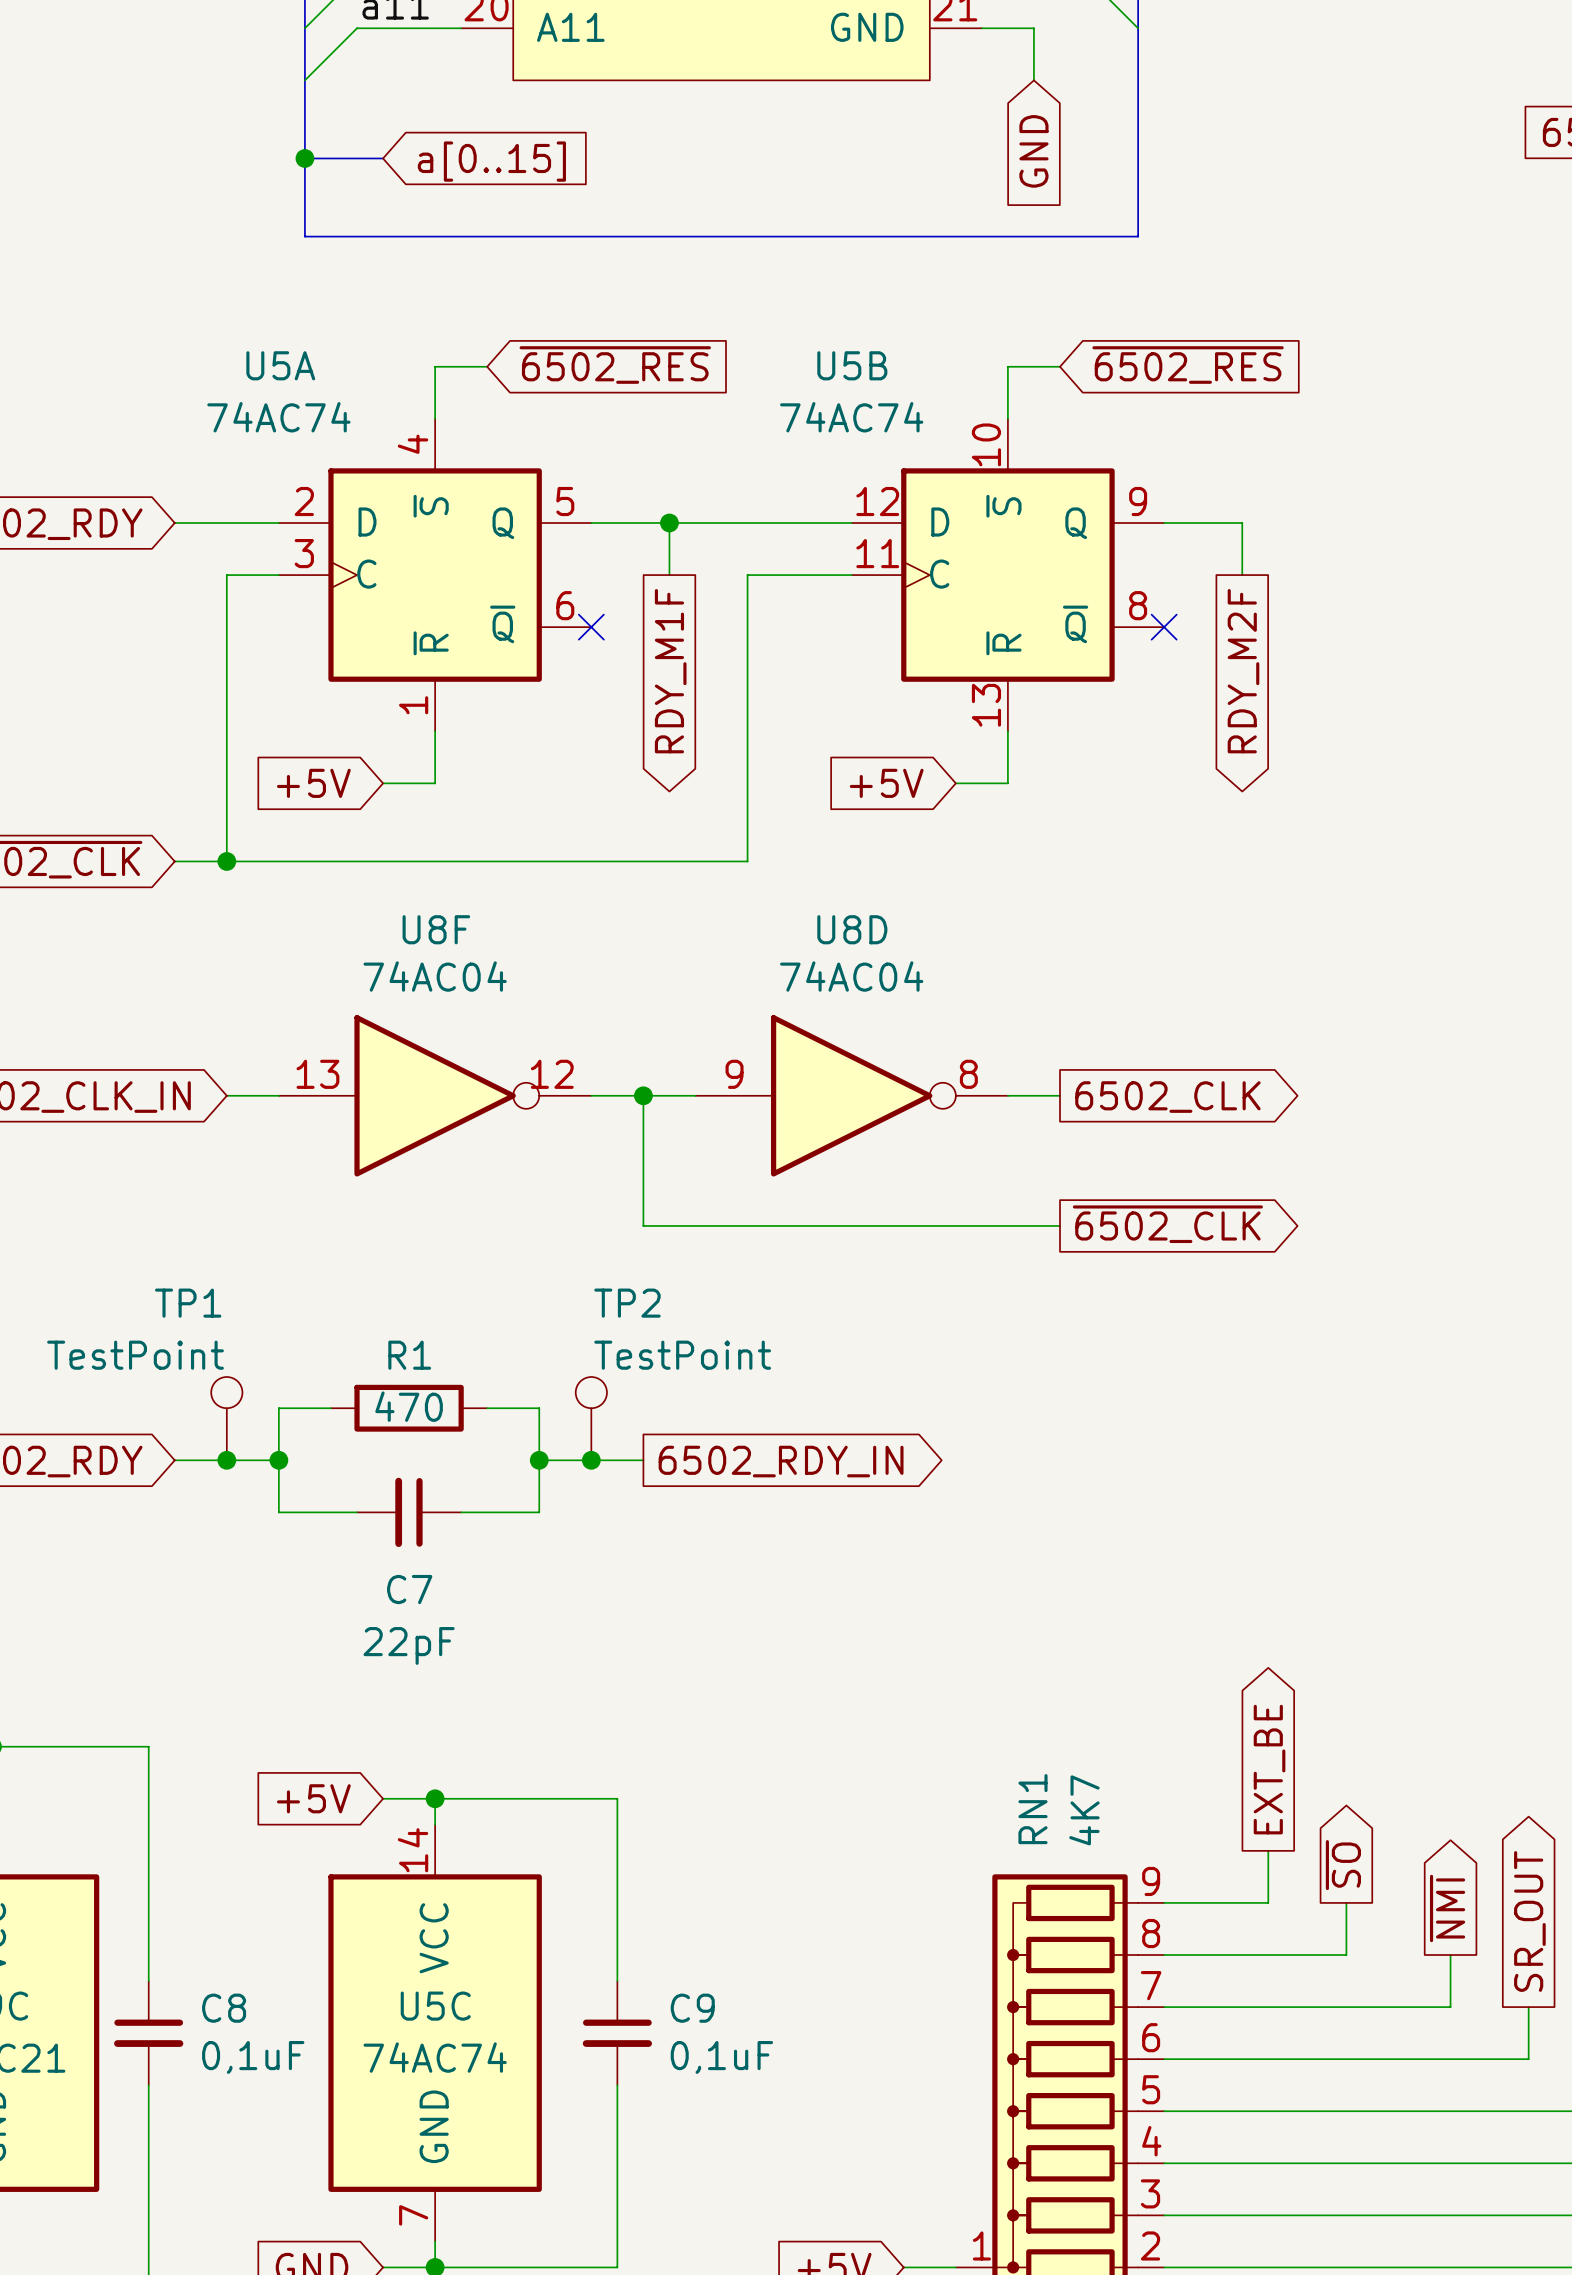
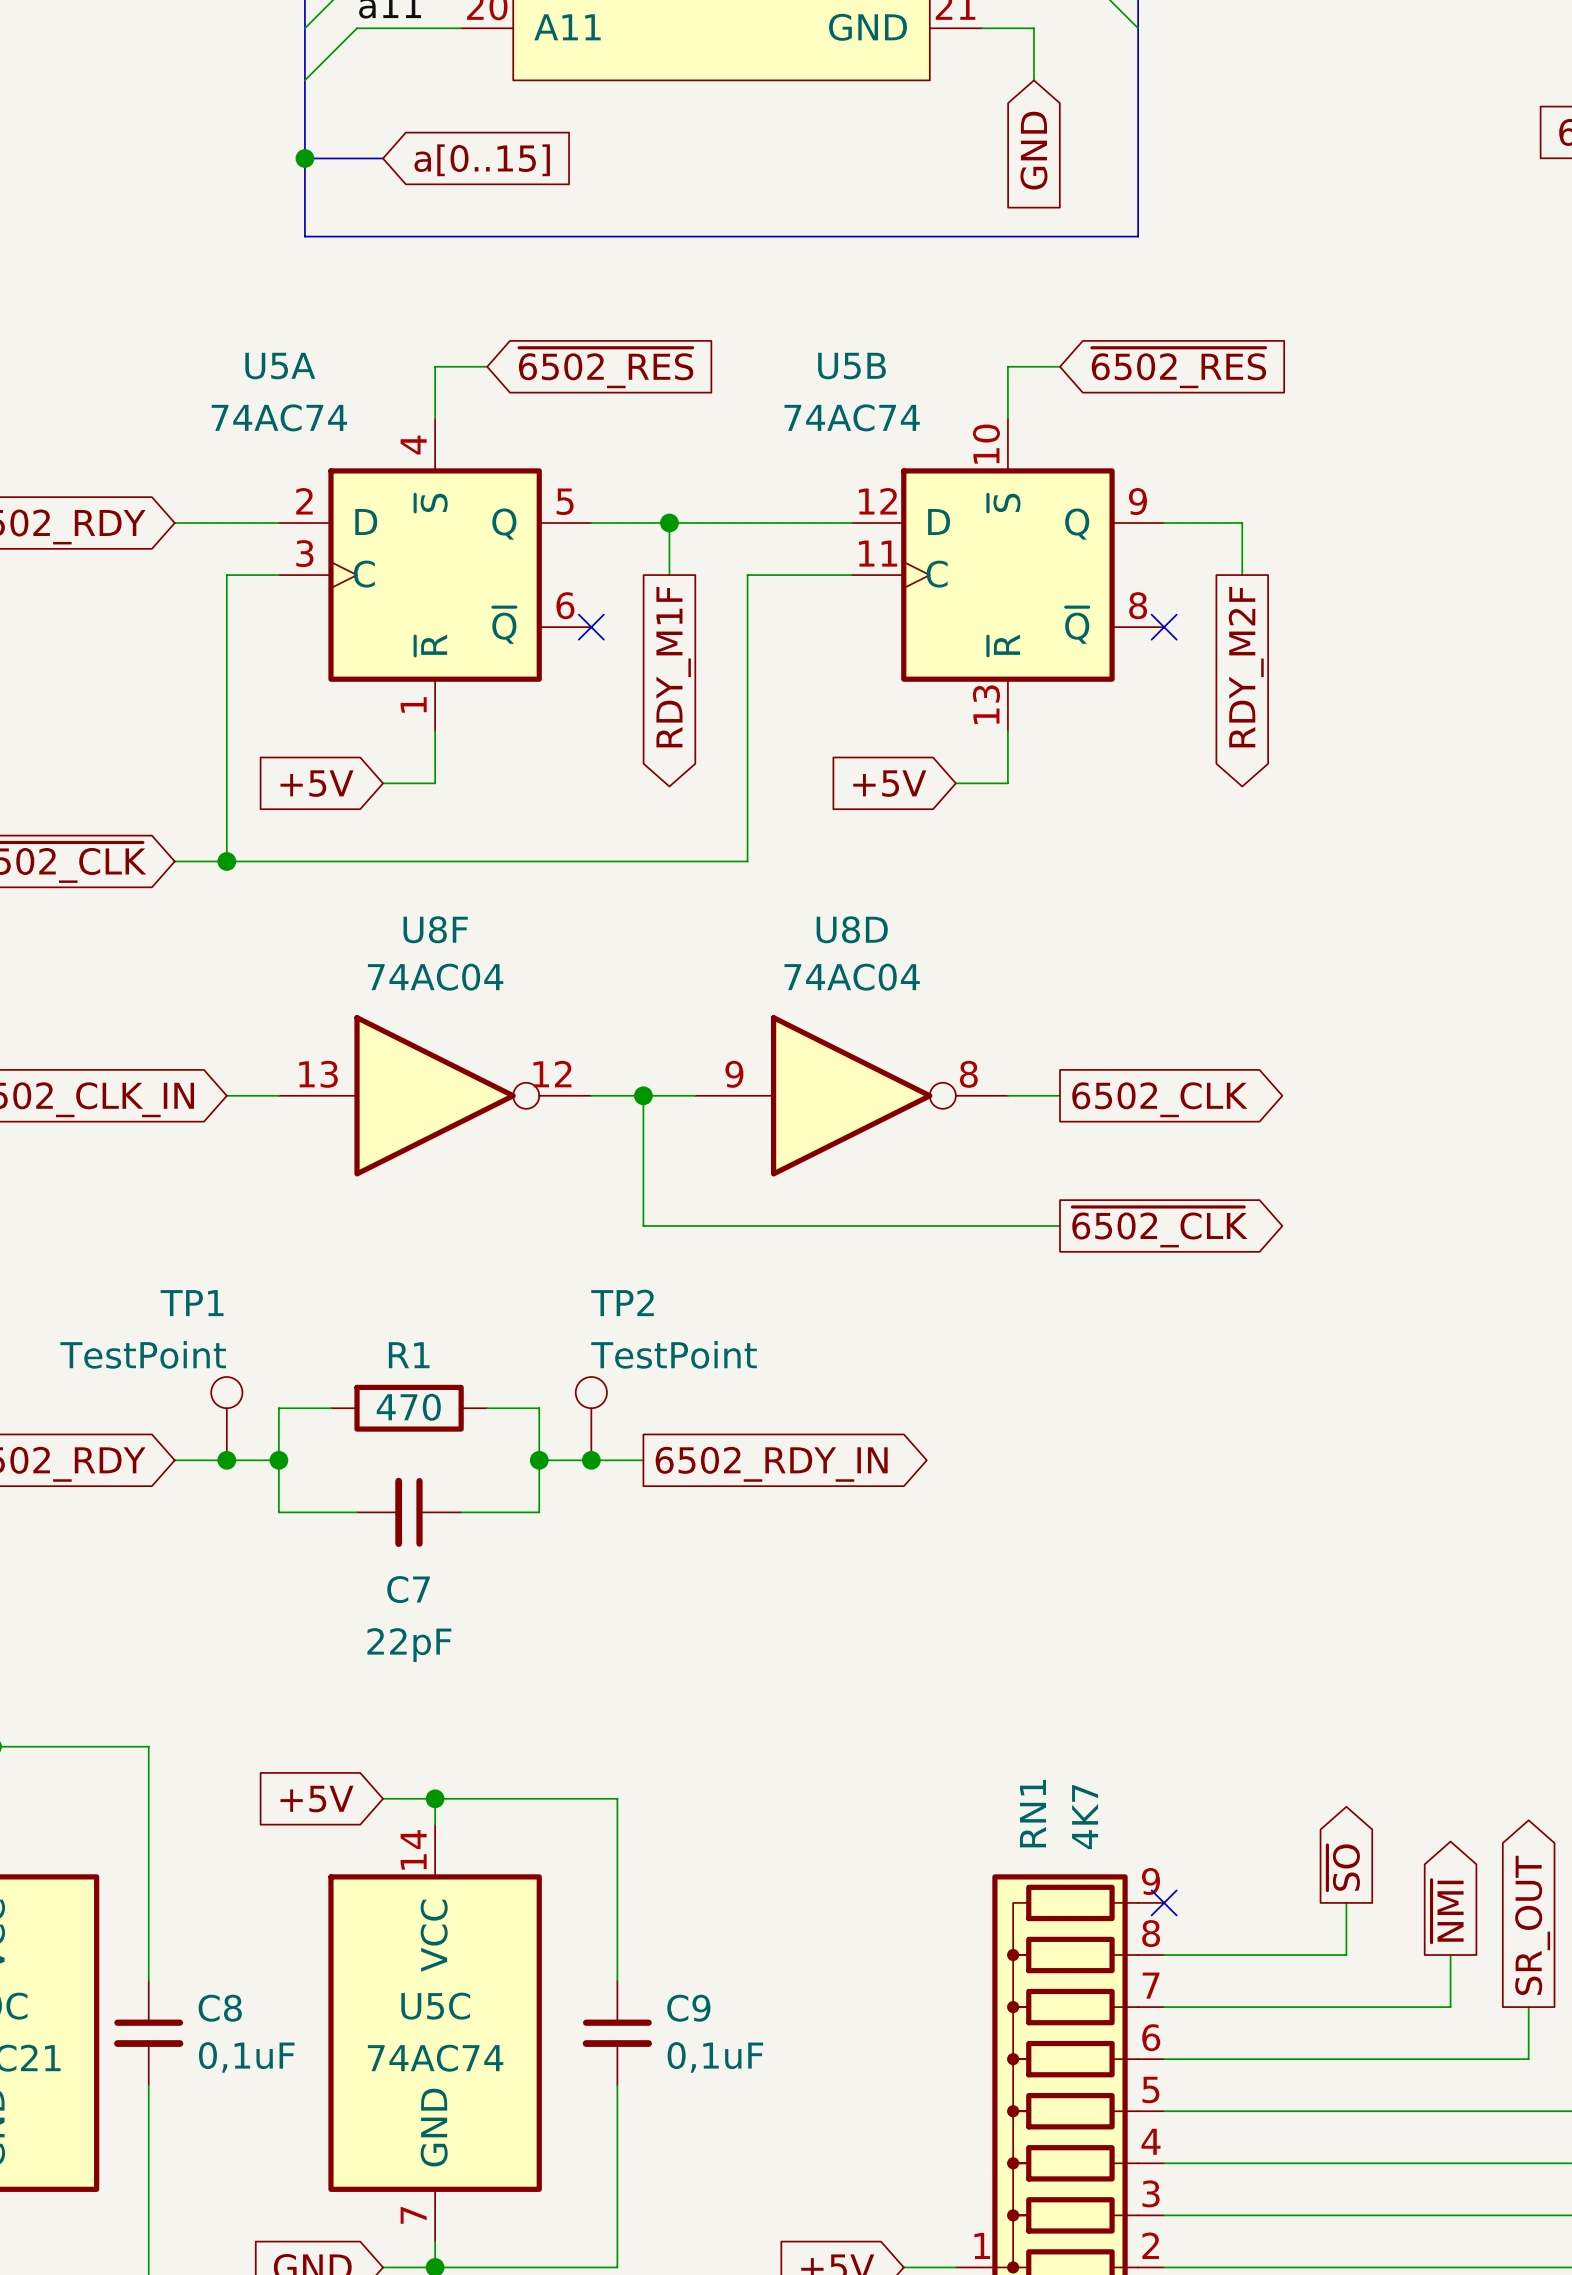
global label: EXT_BE (1269, 1769) -> none
wire: (1268, 1850) (1268, 1902) (1164, 1902) -> none
no-connect mark: none -> (1164, 1902)

